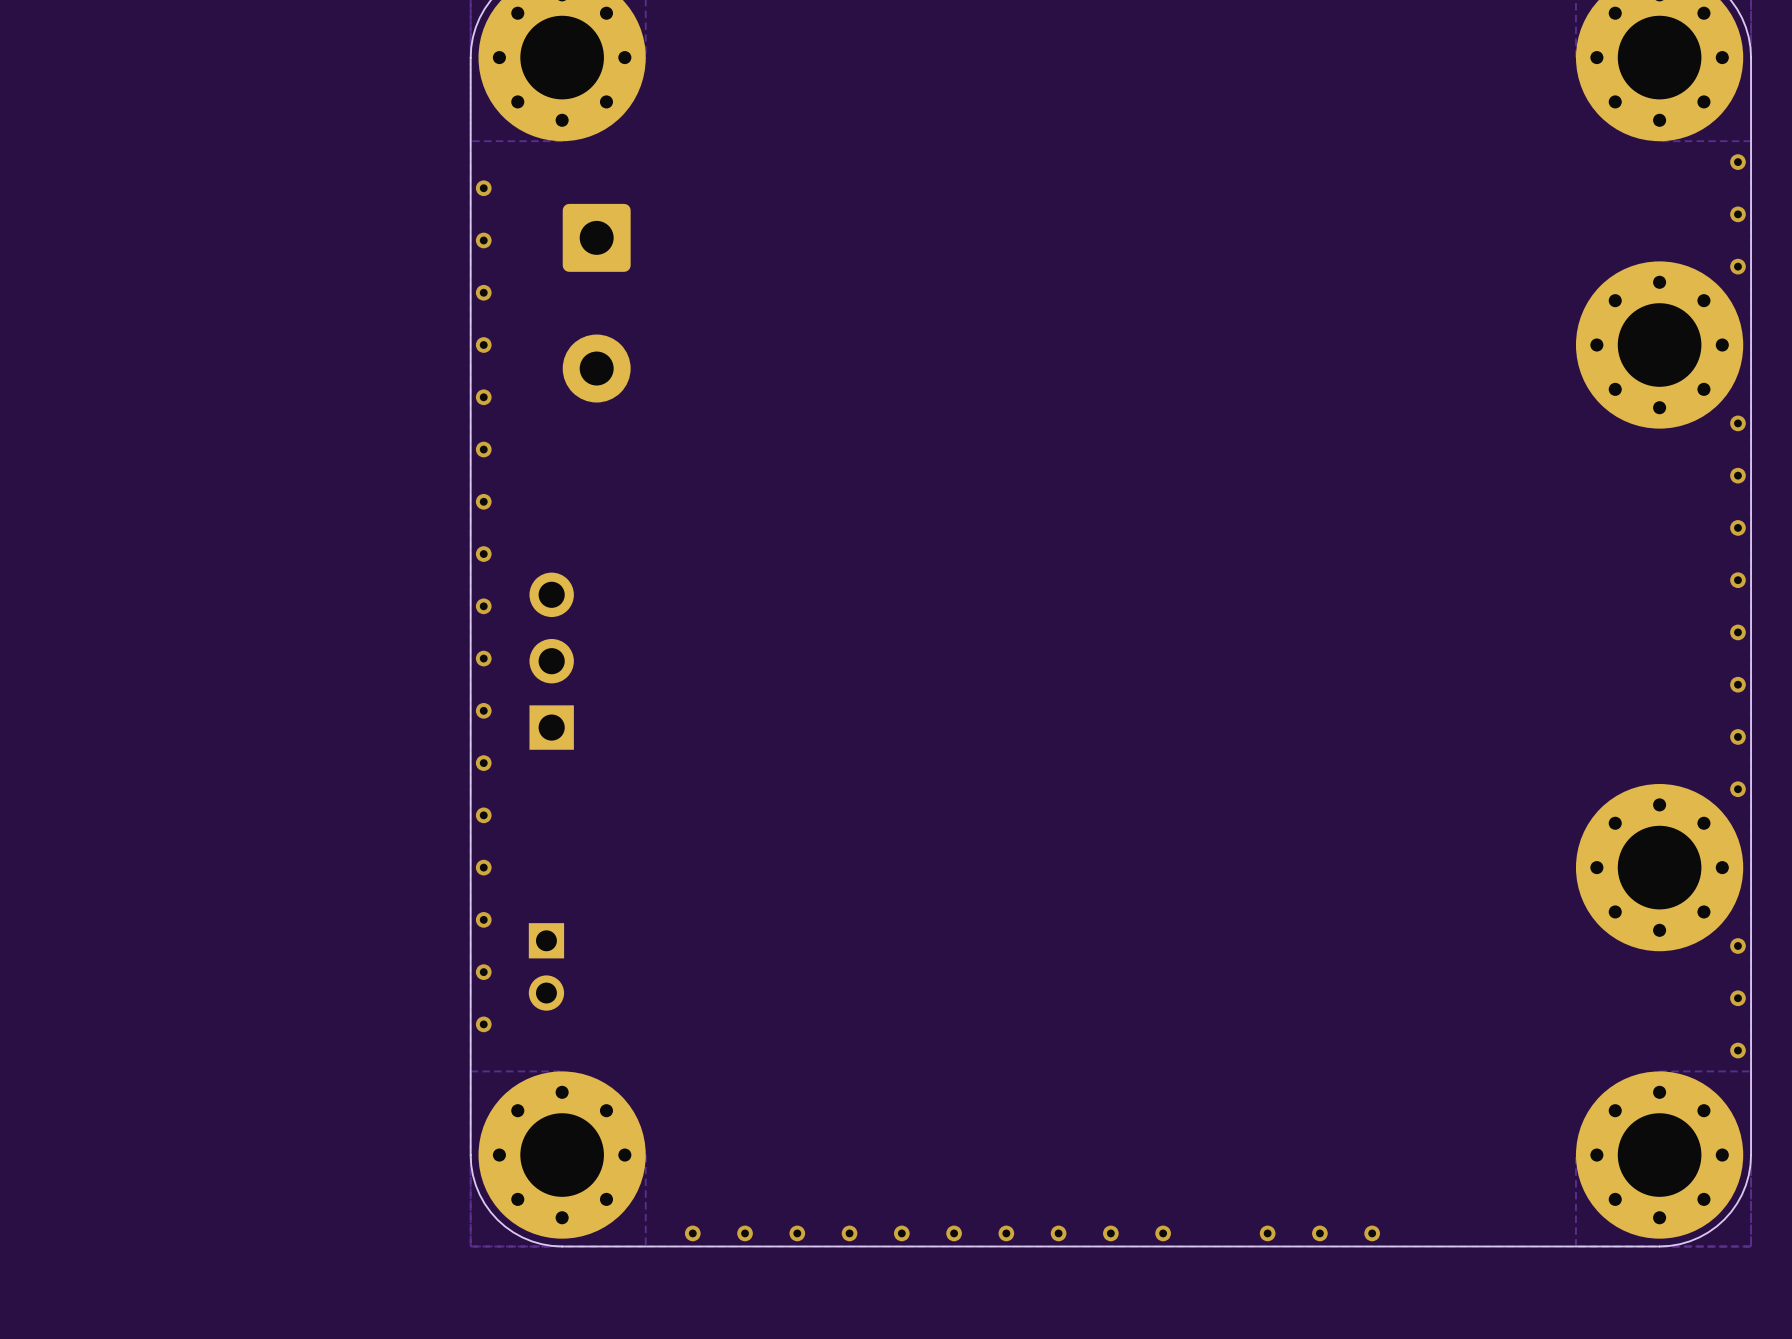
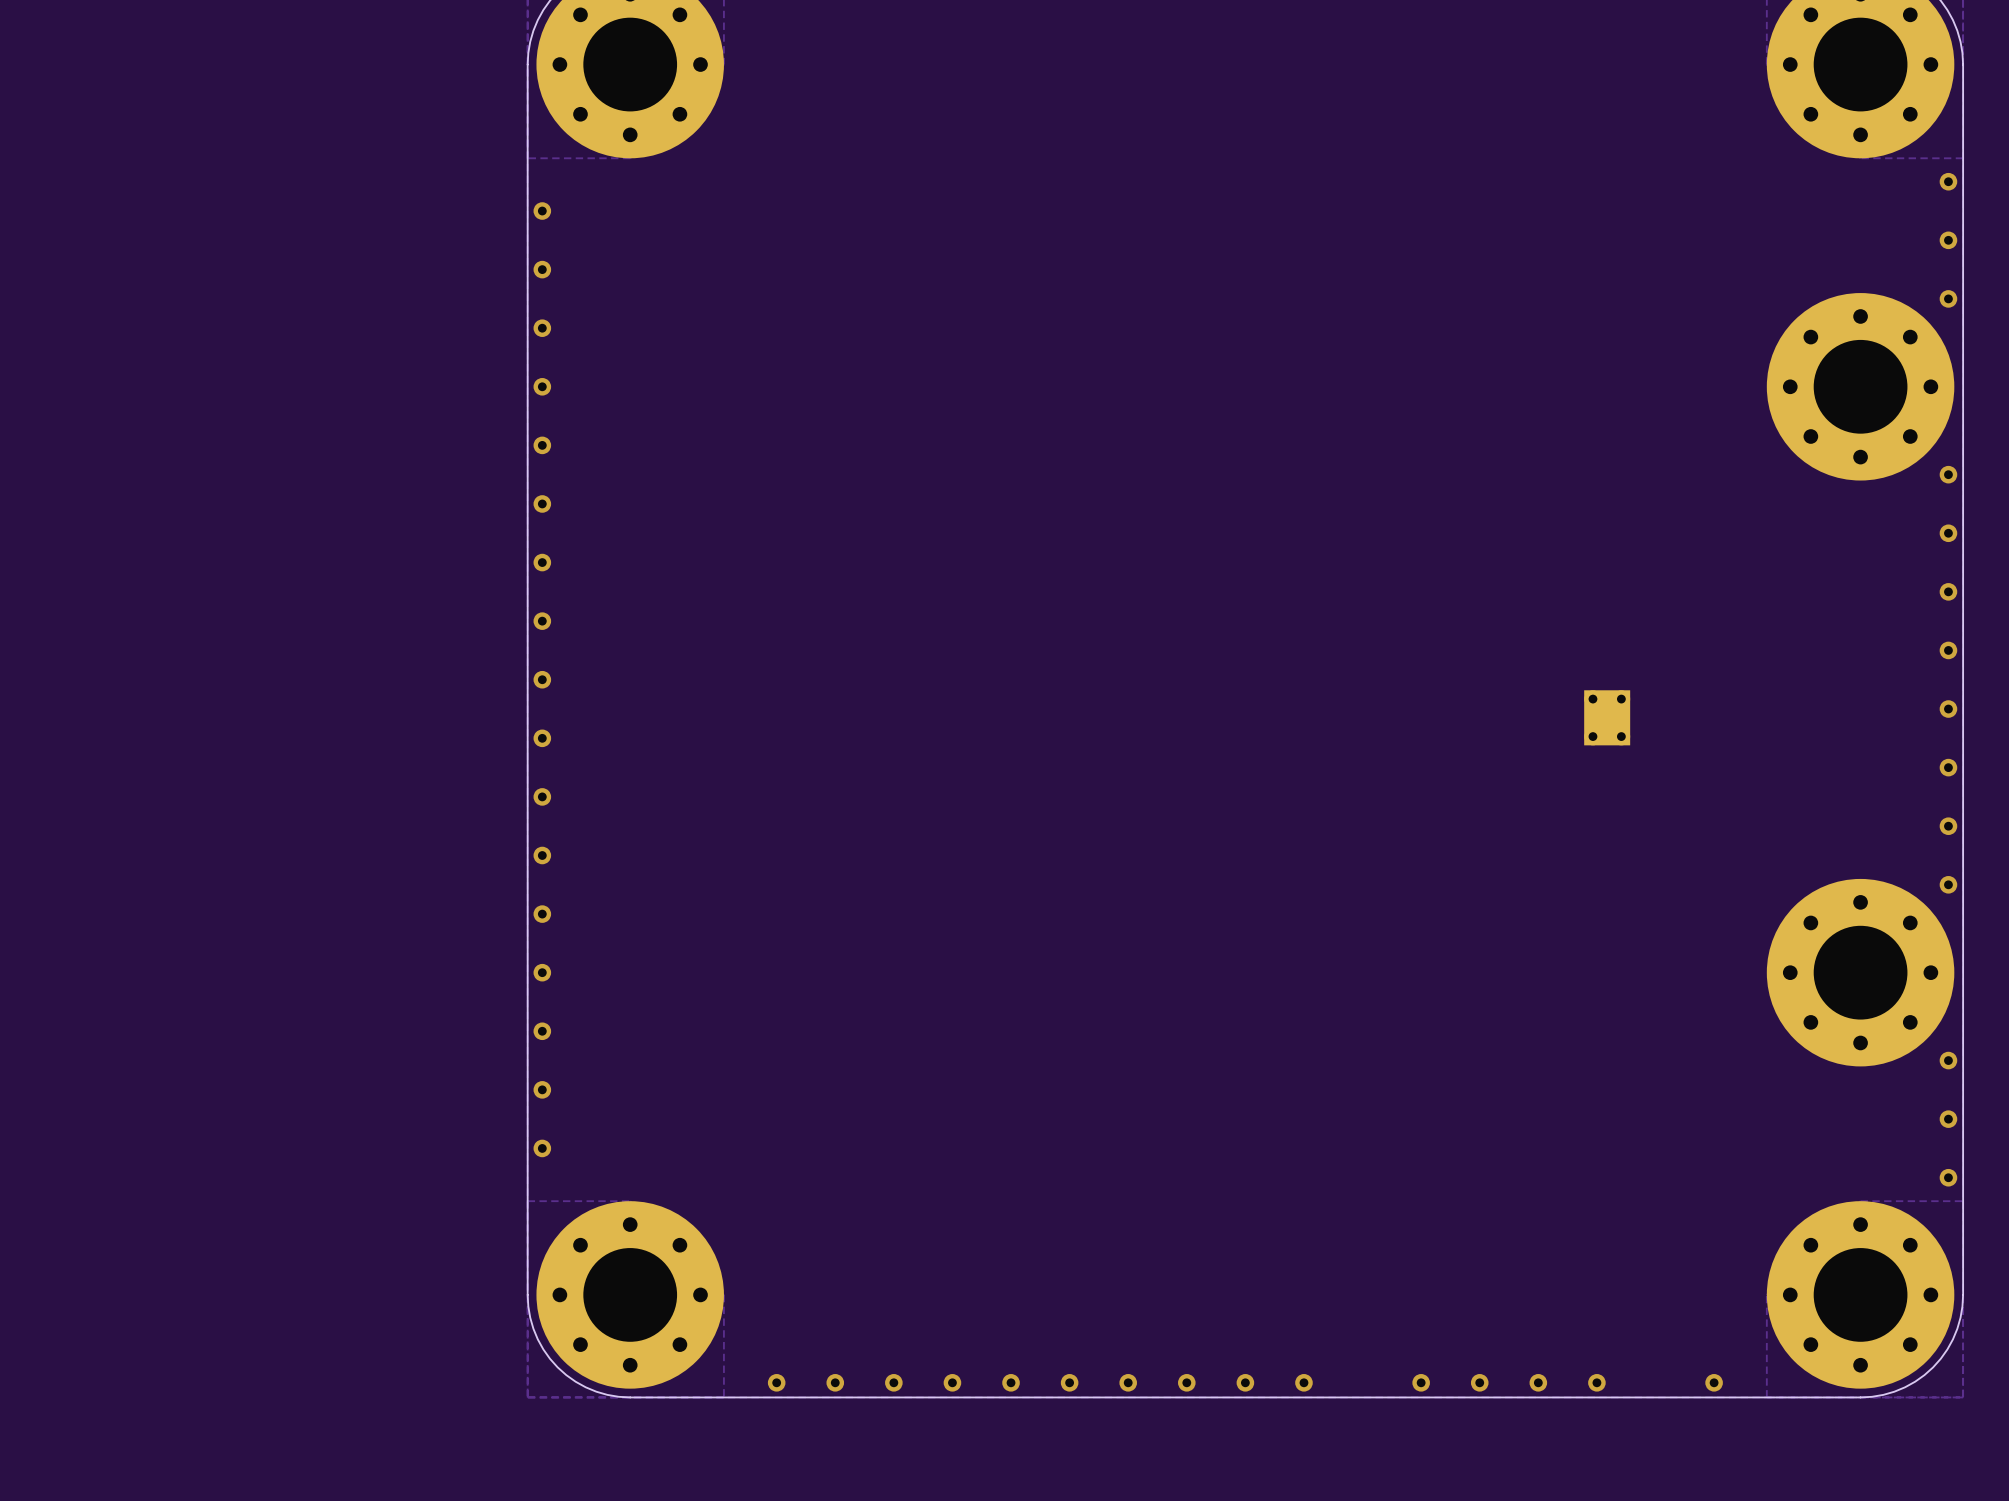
part: (596, 303) -> none
part: none -> (1607, 717)
part: (551, 661) -> none
part: (546, 966) -> none
via: none -> (1596, 1382)
via: none -> (1714, 1382)

